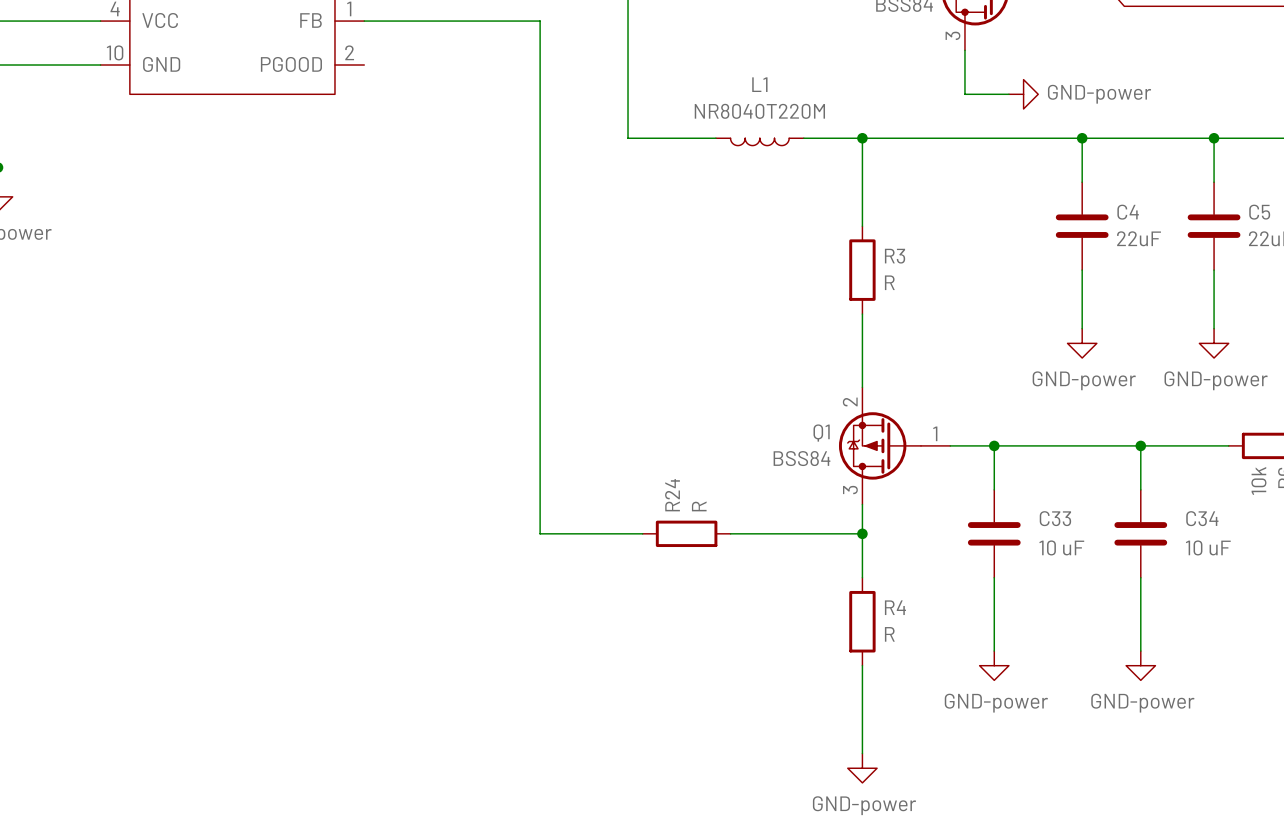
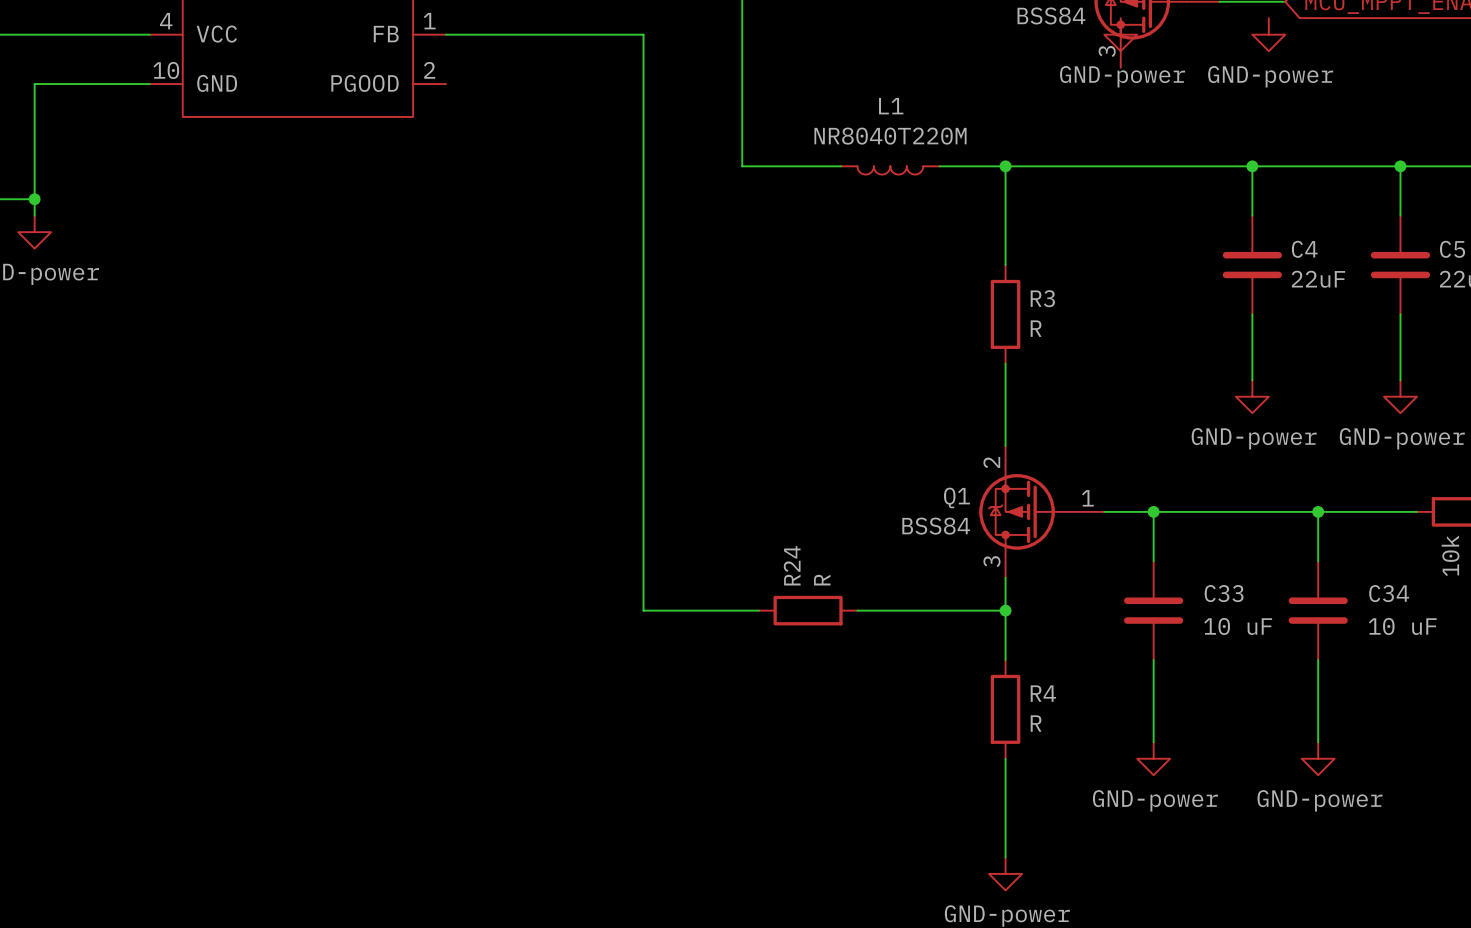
power symbol: none -> GND-power (1120, 34)
power symbol: none -> GND-power (1268, 34)
wire: (964, 50) (964, 94) (1008, 94) -> none
power symbol: GND-power (1023, 94) -> none

